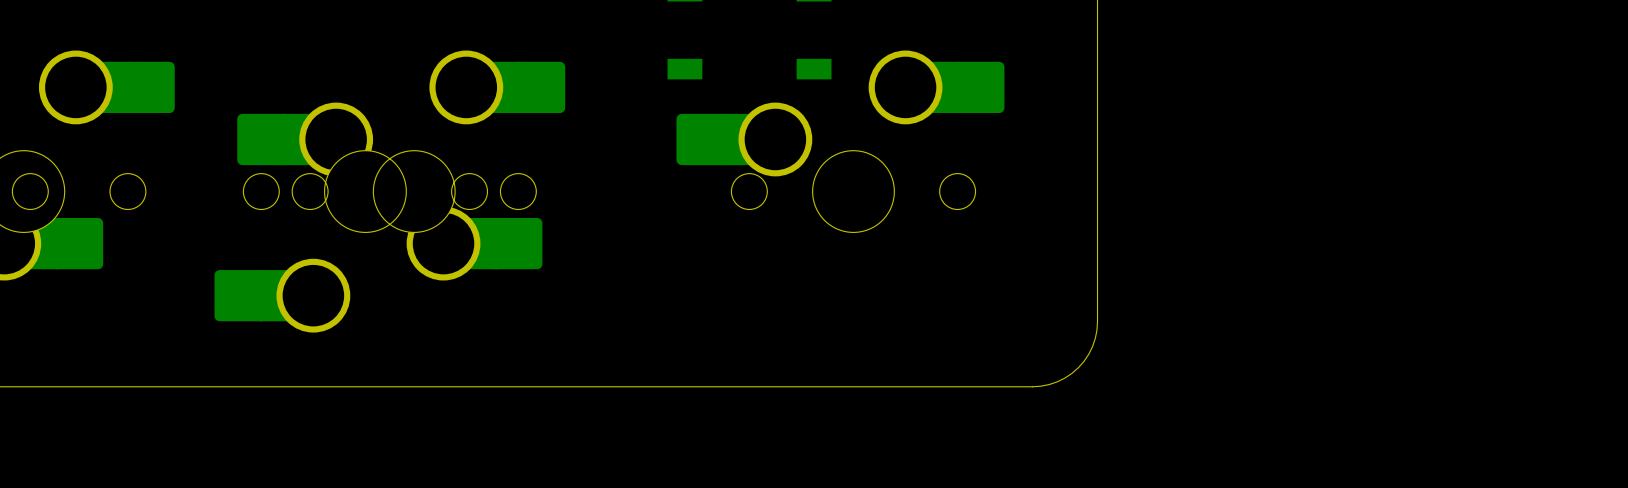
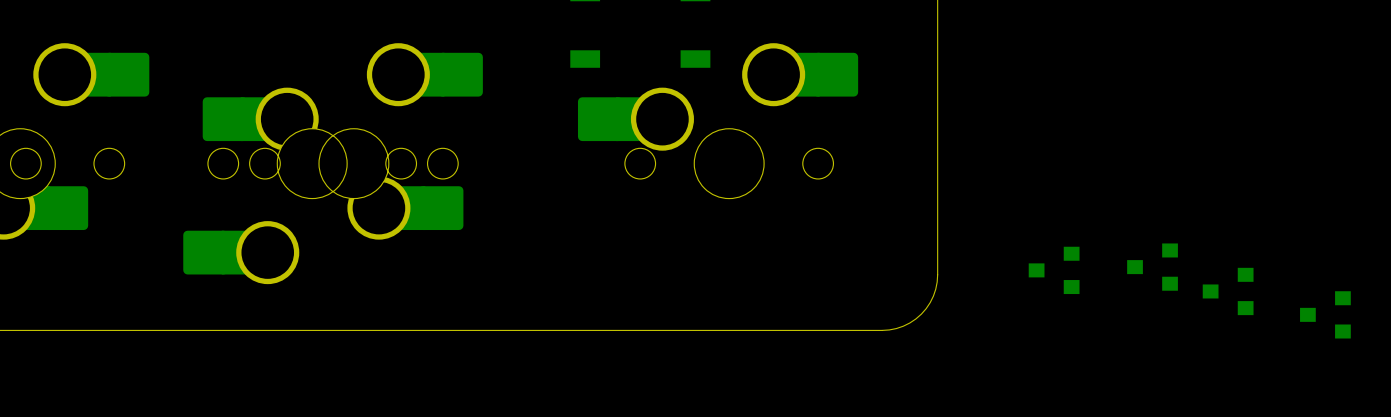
part: none -> (1152, 267)
part: none -> (1054, 270)
part: none -> (1228, 291)
part: none -> (1325, 314)

